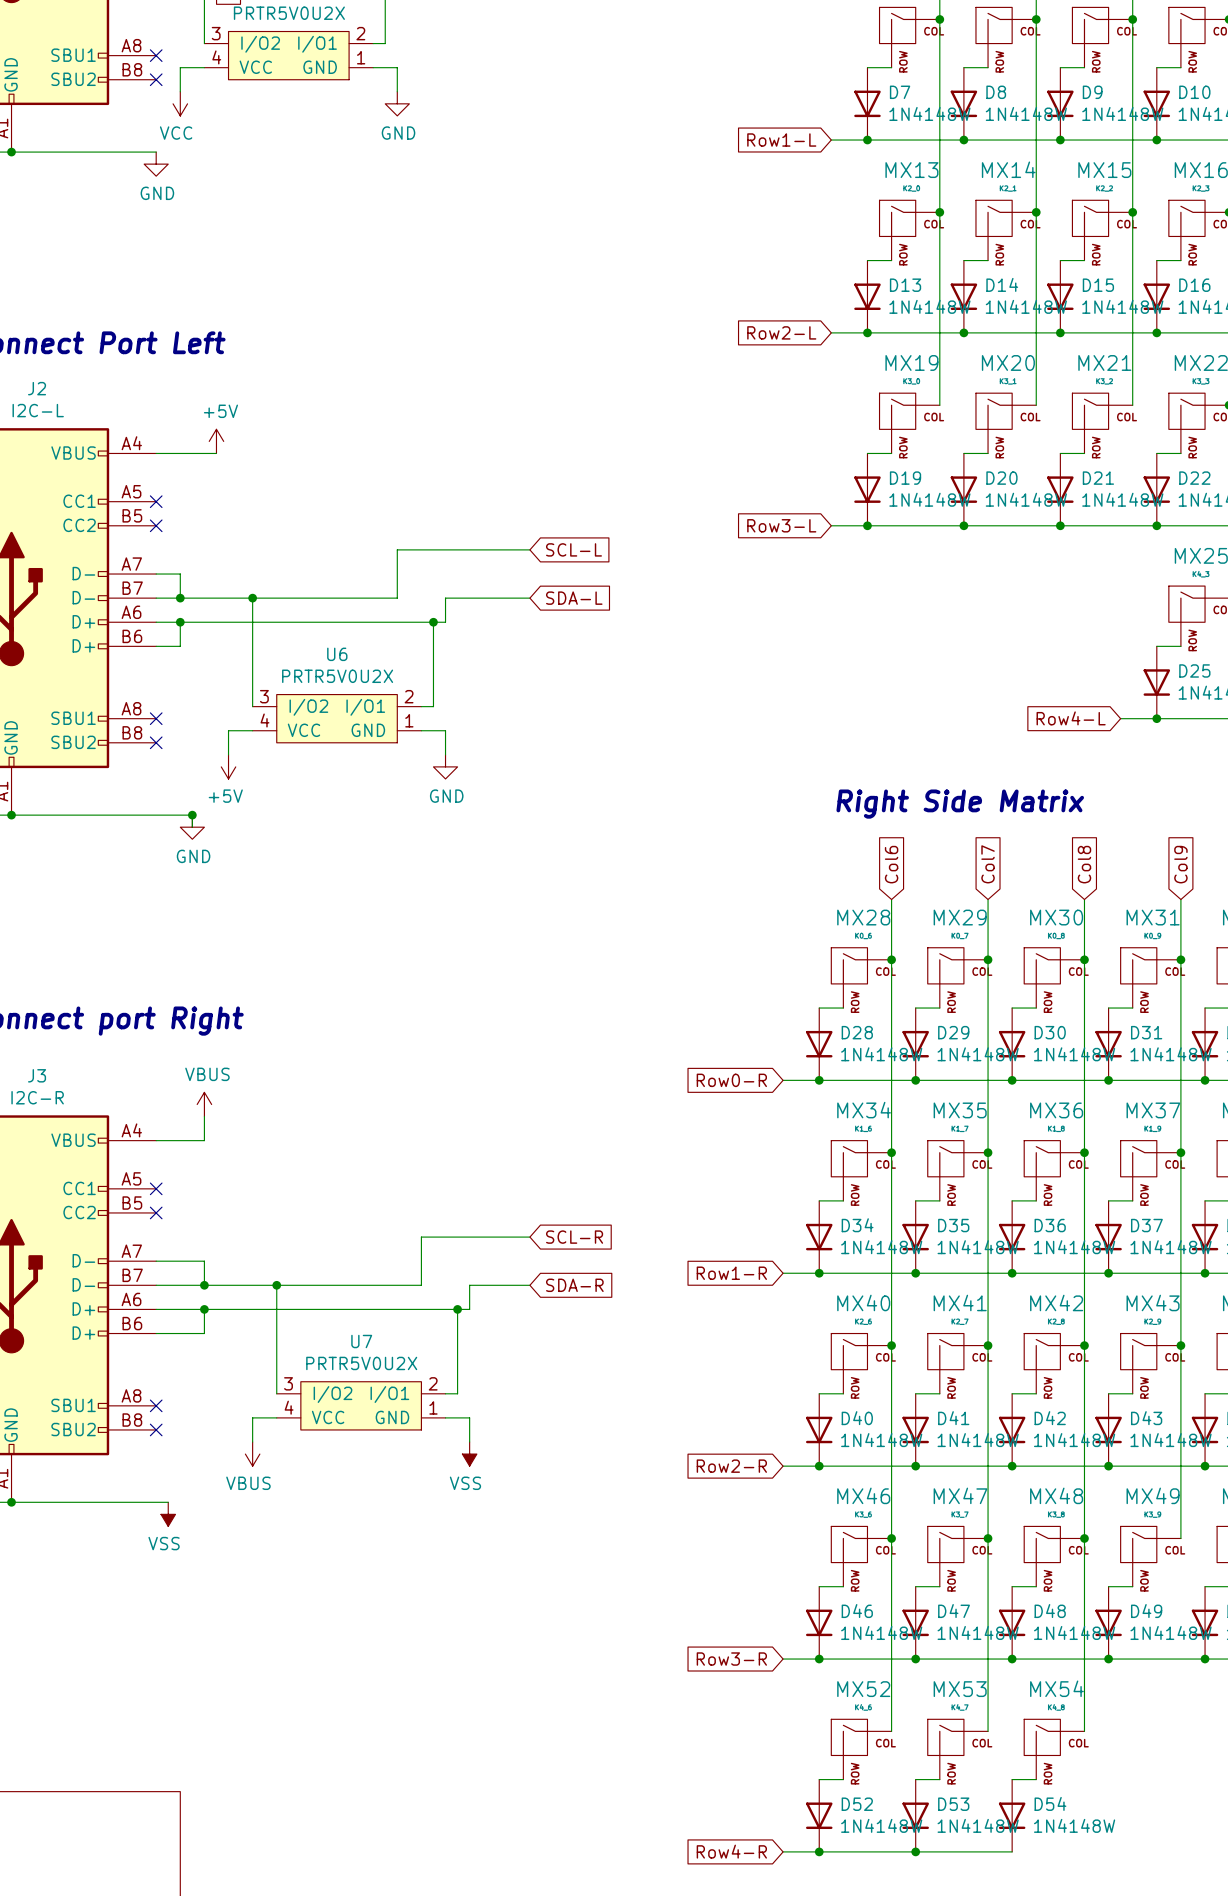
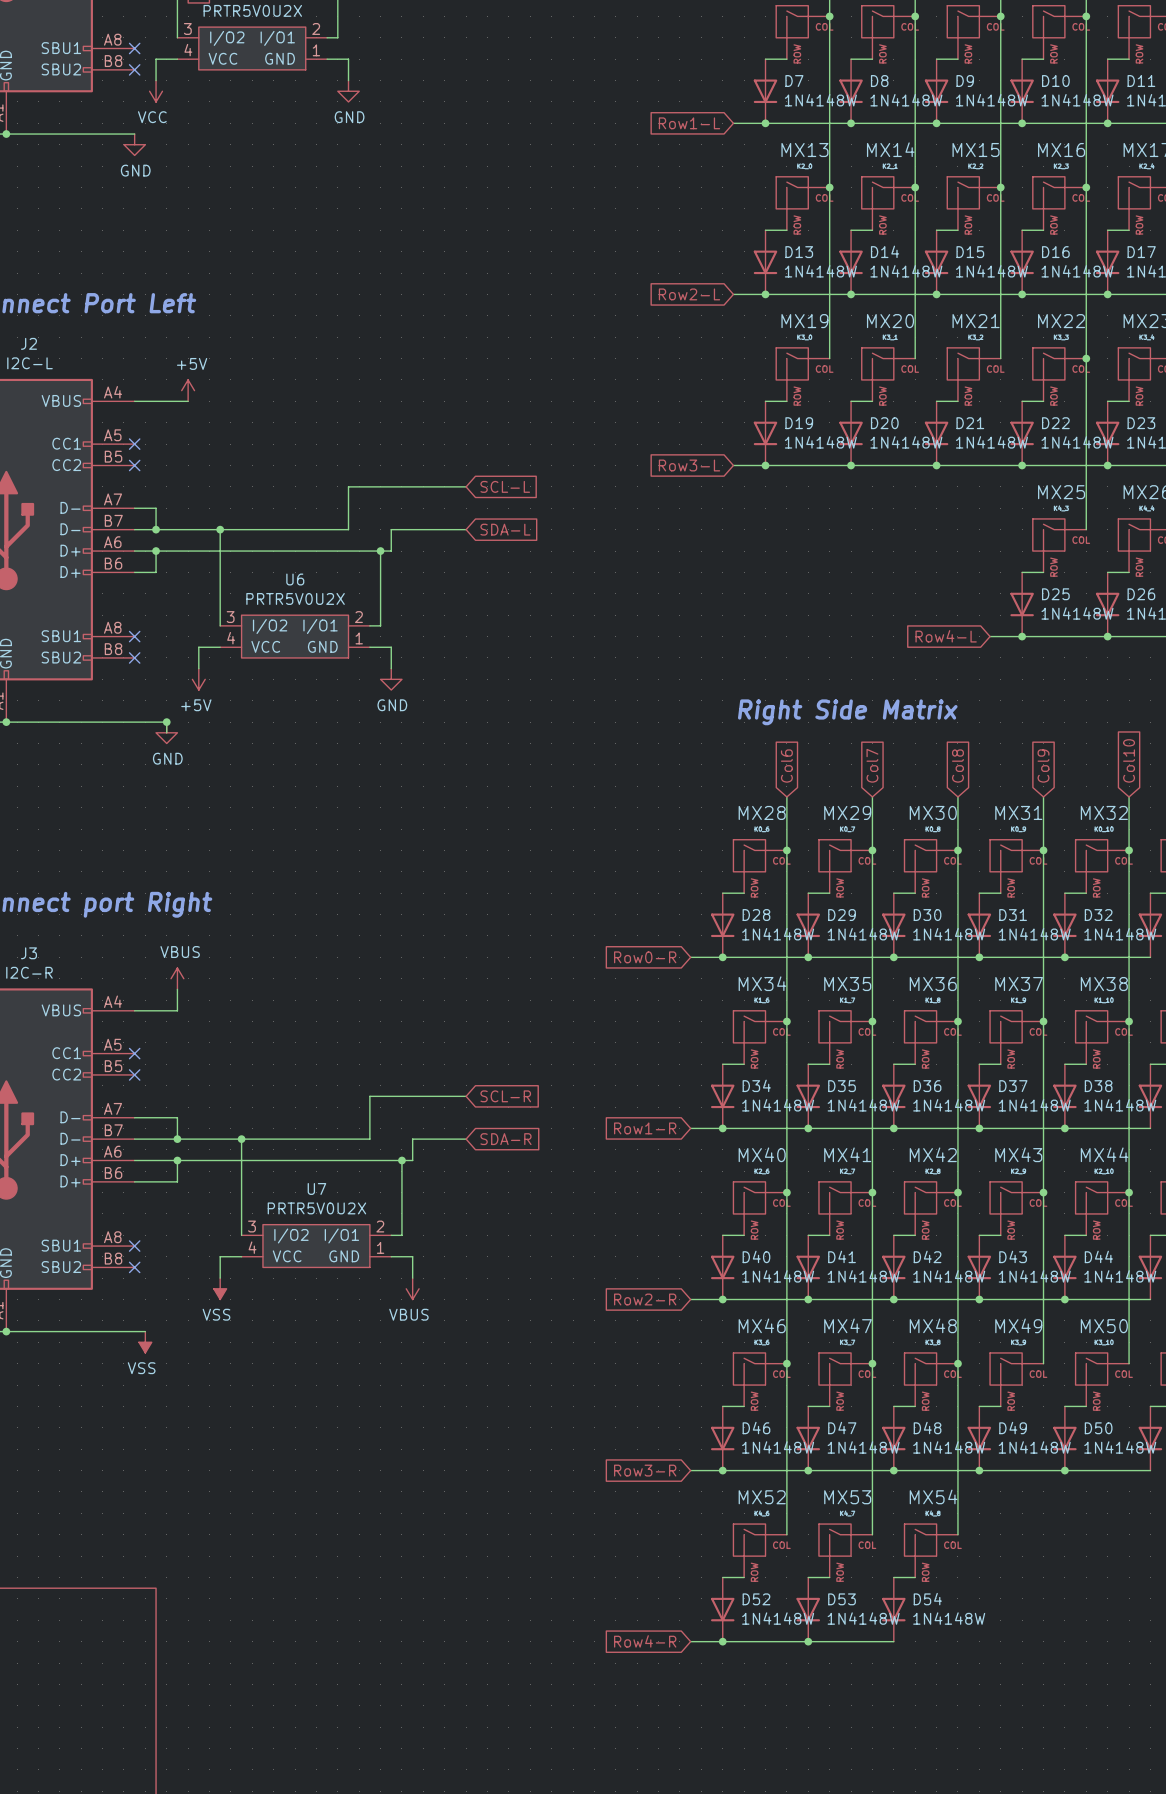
power symbol: VBUS (252, 1454) -> VSS (220, 1288)
power symbol: VSS (469, 1454) -> VBUS (412, 1288)

